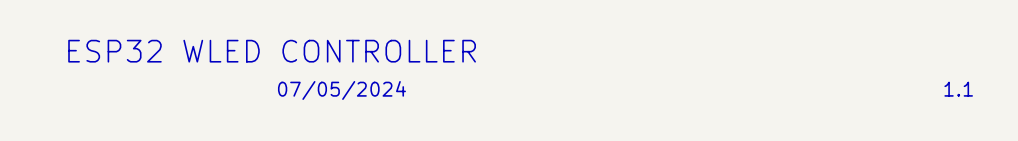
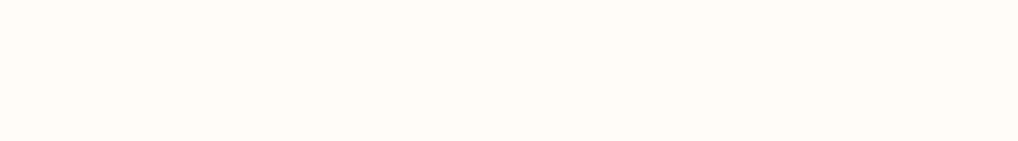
text: ESP32 WLED CONTROLLER (272, 51) -> none
text: 1.1 (958, 89) -> none
text: 07/05/2024 (341, 90) -> none

